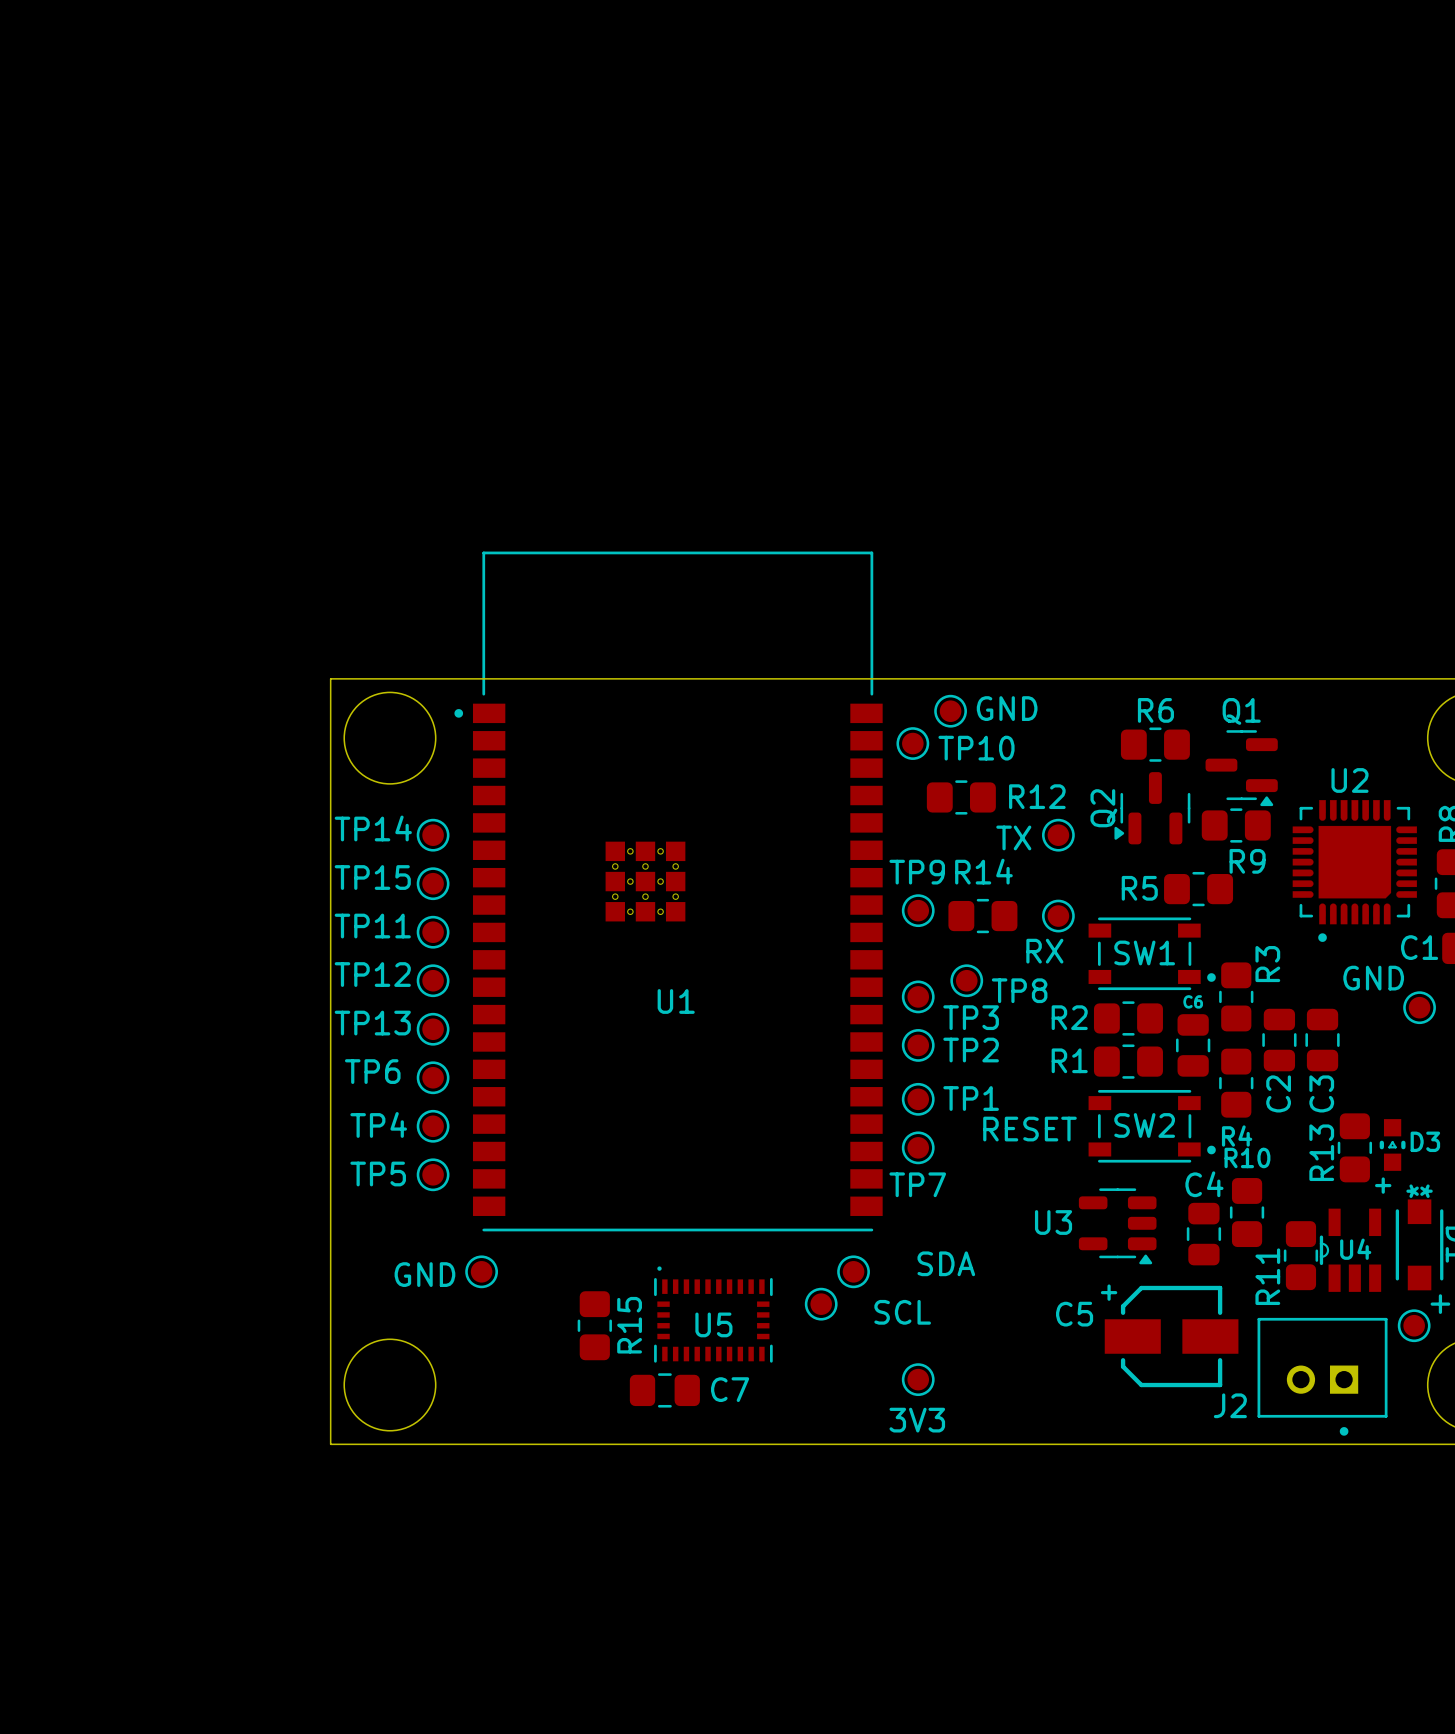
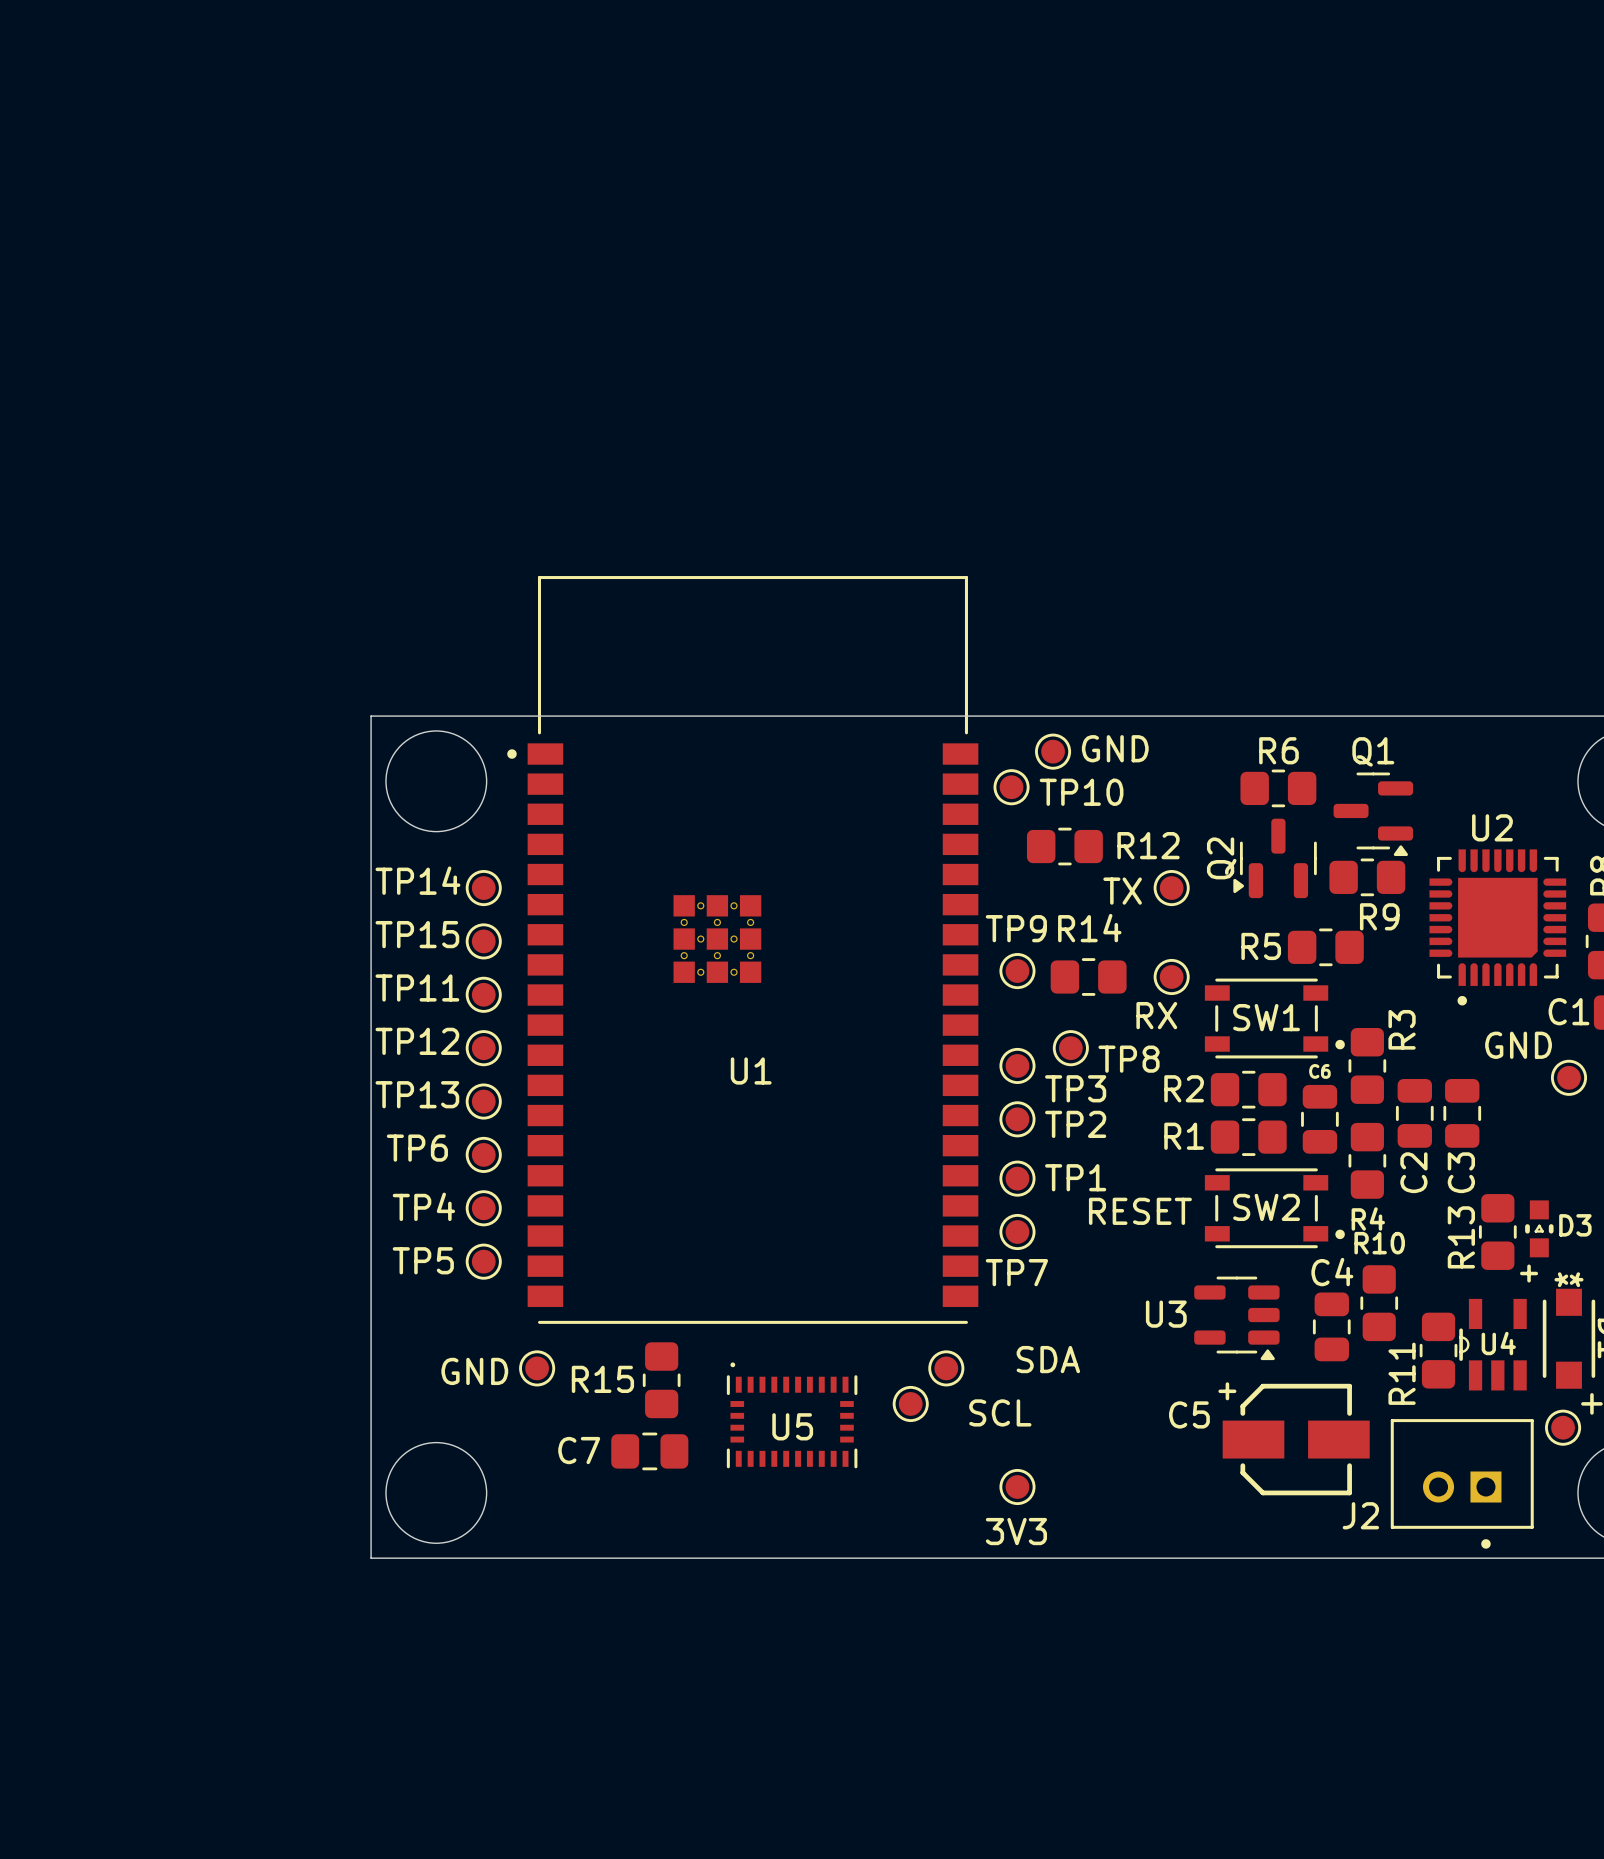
R15 position: (594, 1325) -> (661, 1380)
R15 name rotation: 0° (629, 1325) -> 90° clockwise (602, 1379)
R15 name position: R15 (629, 1325) -> R15 (602, 1379)
C7 name position: C7 (730, 1389) -> C7 (579, 1450)
C7 position: (664, 1390) -> (649, 1451)

